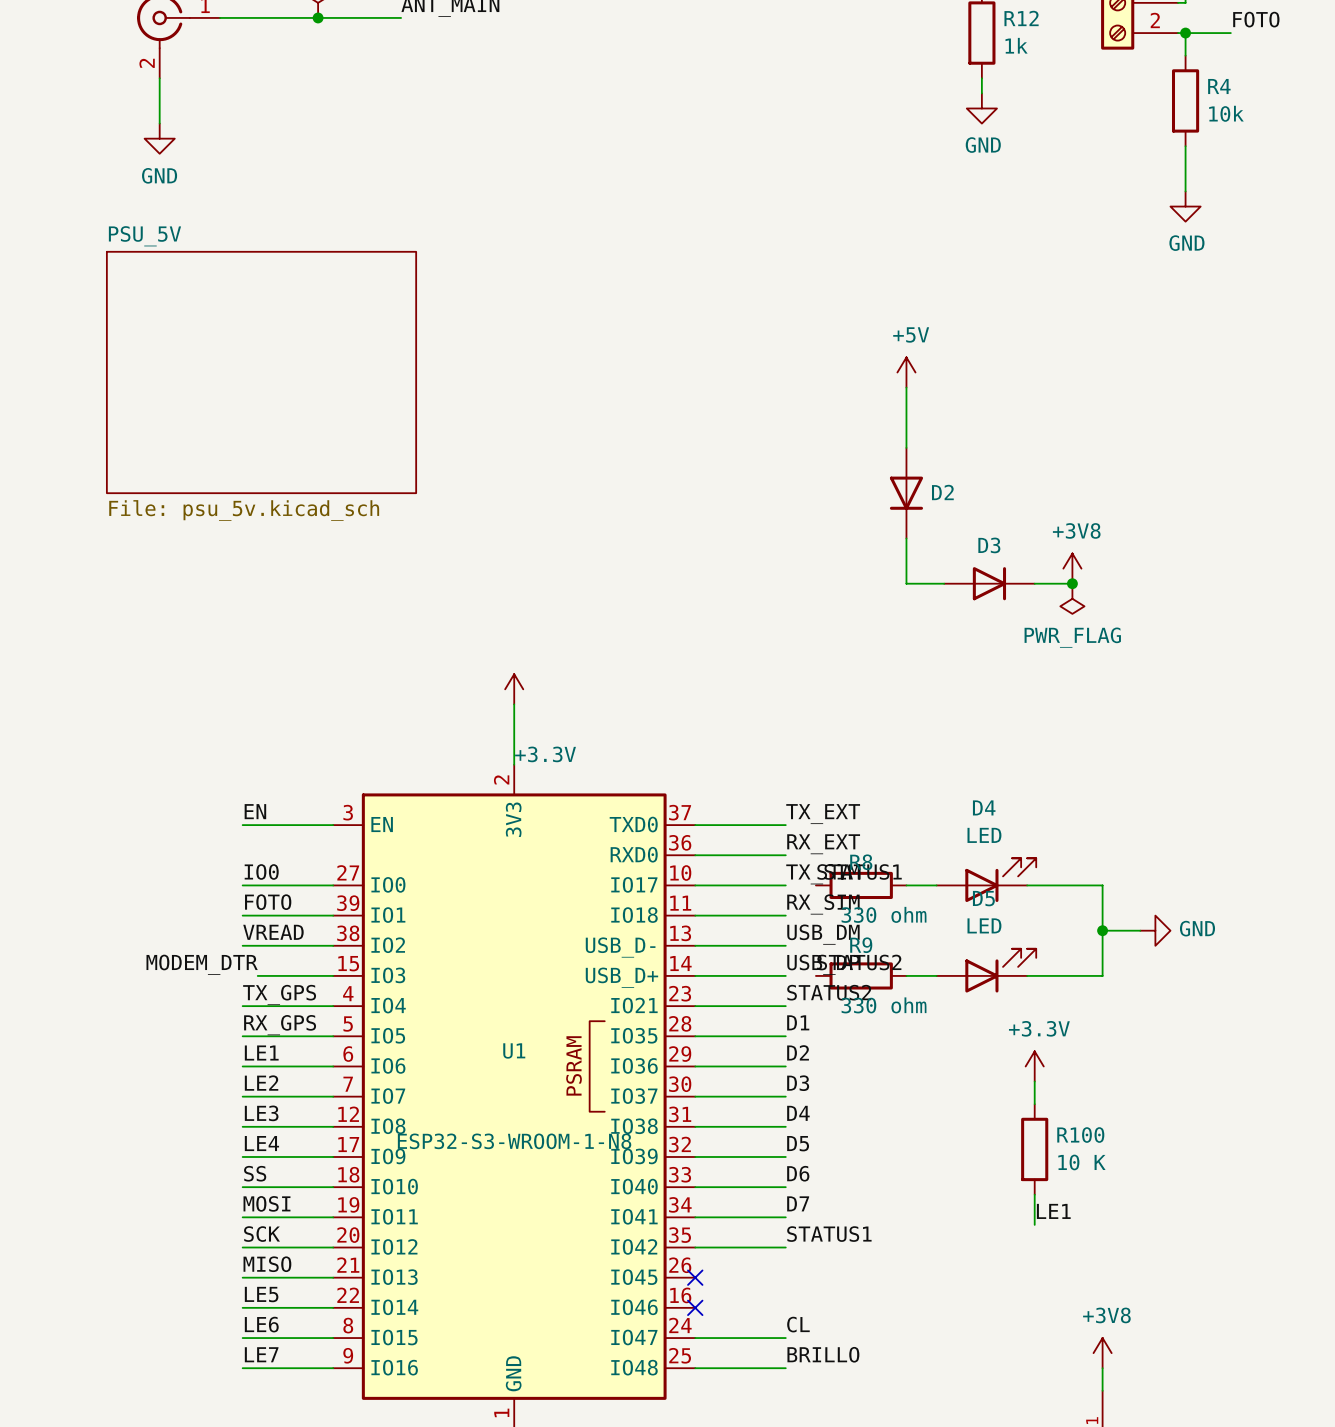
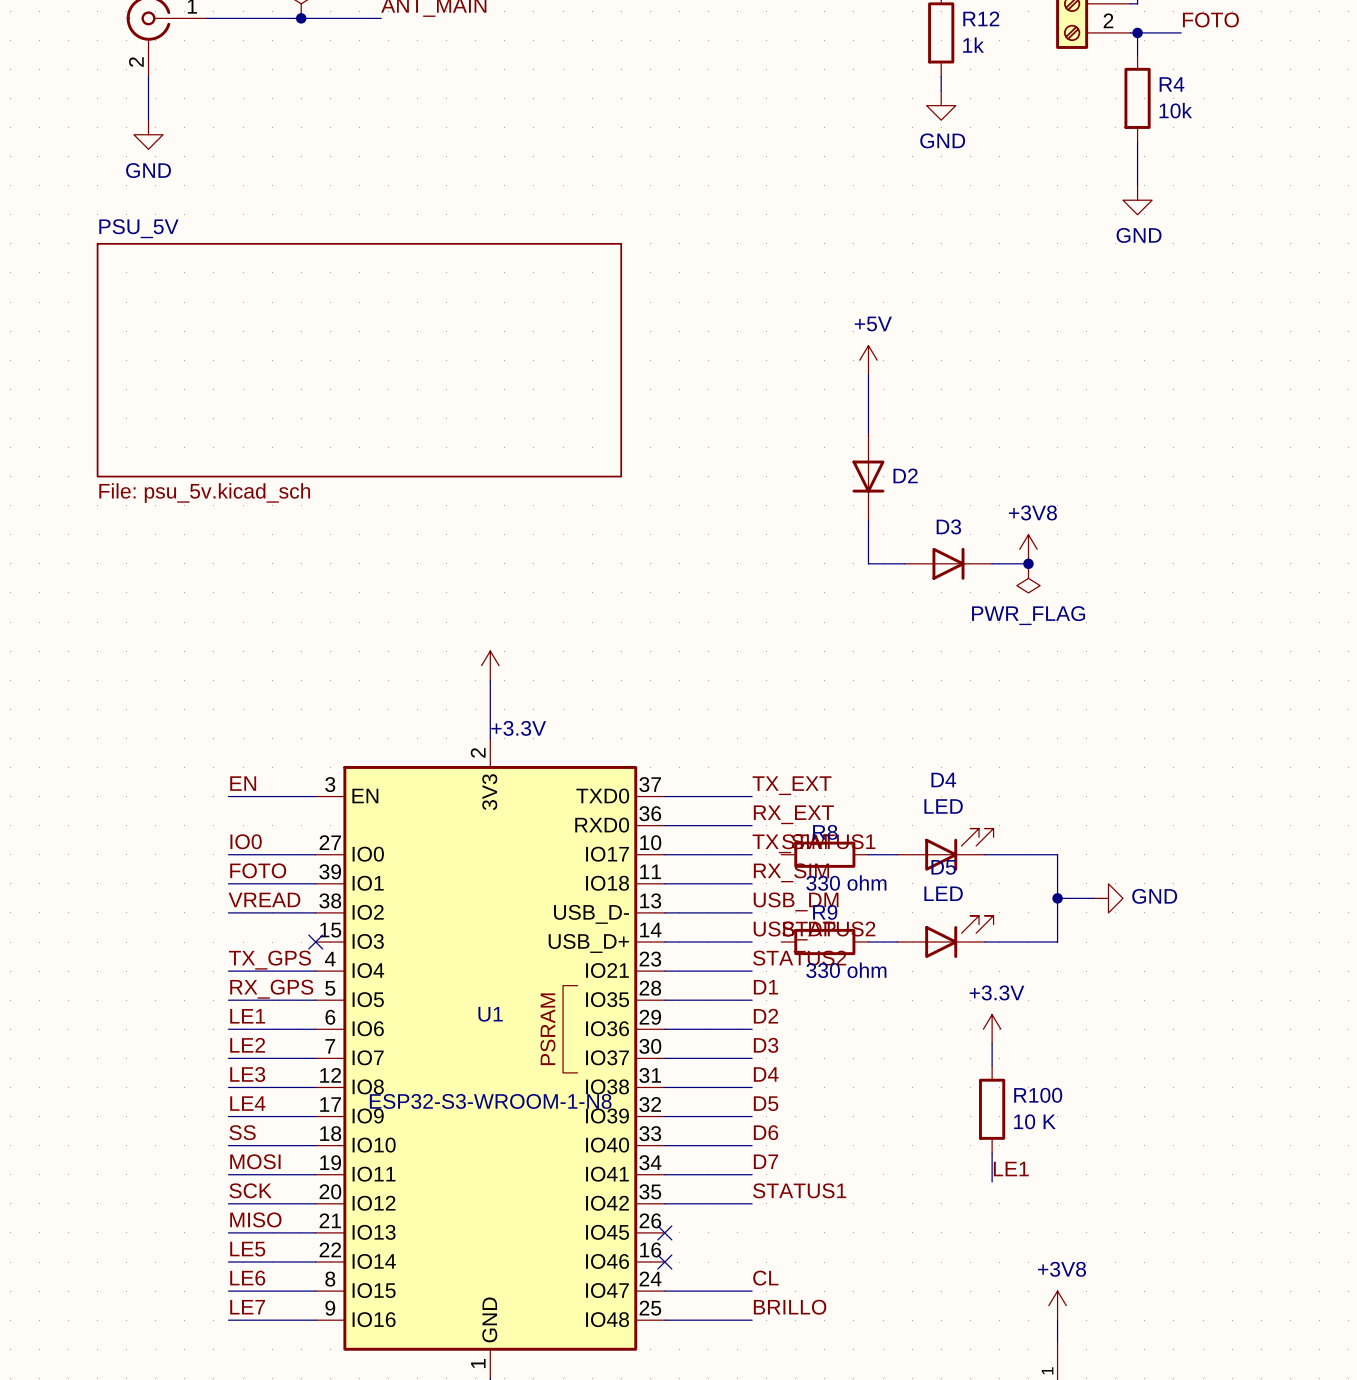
sheet PSU_5V shape: [105, 250, 418, 495] -> [96, 242, 623, 478]
label: MODEM_DTR (202, 964) -> none
wire: (257, 975) (333, 975) -> none
no-connect mark: none -> (315, 942)

